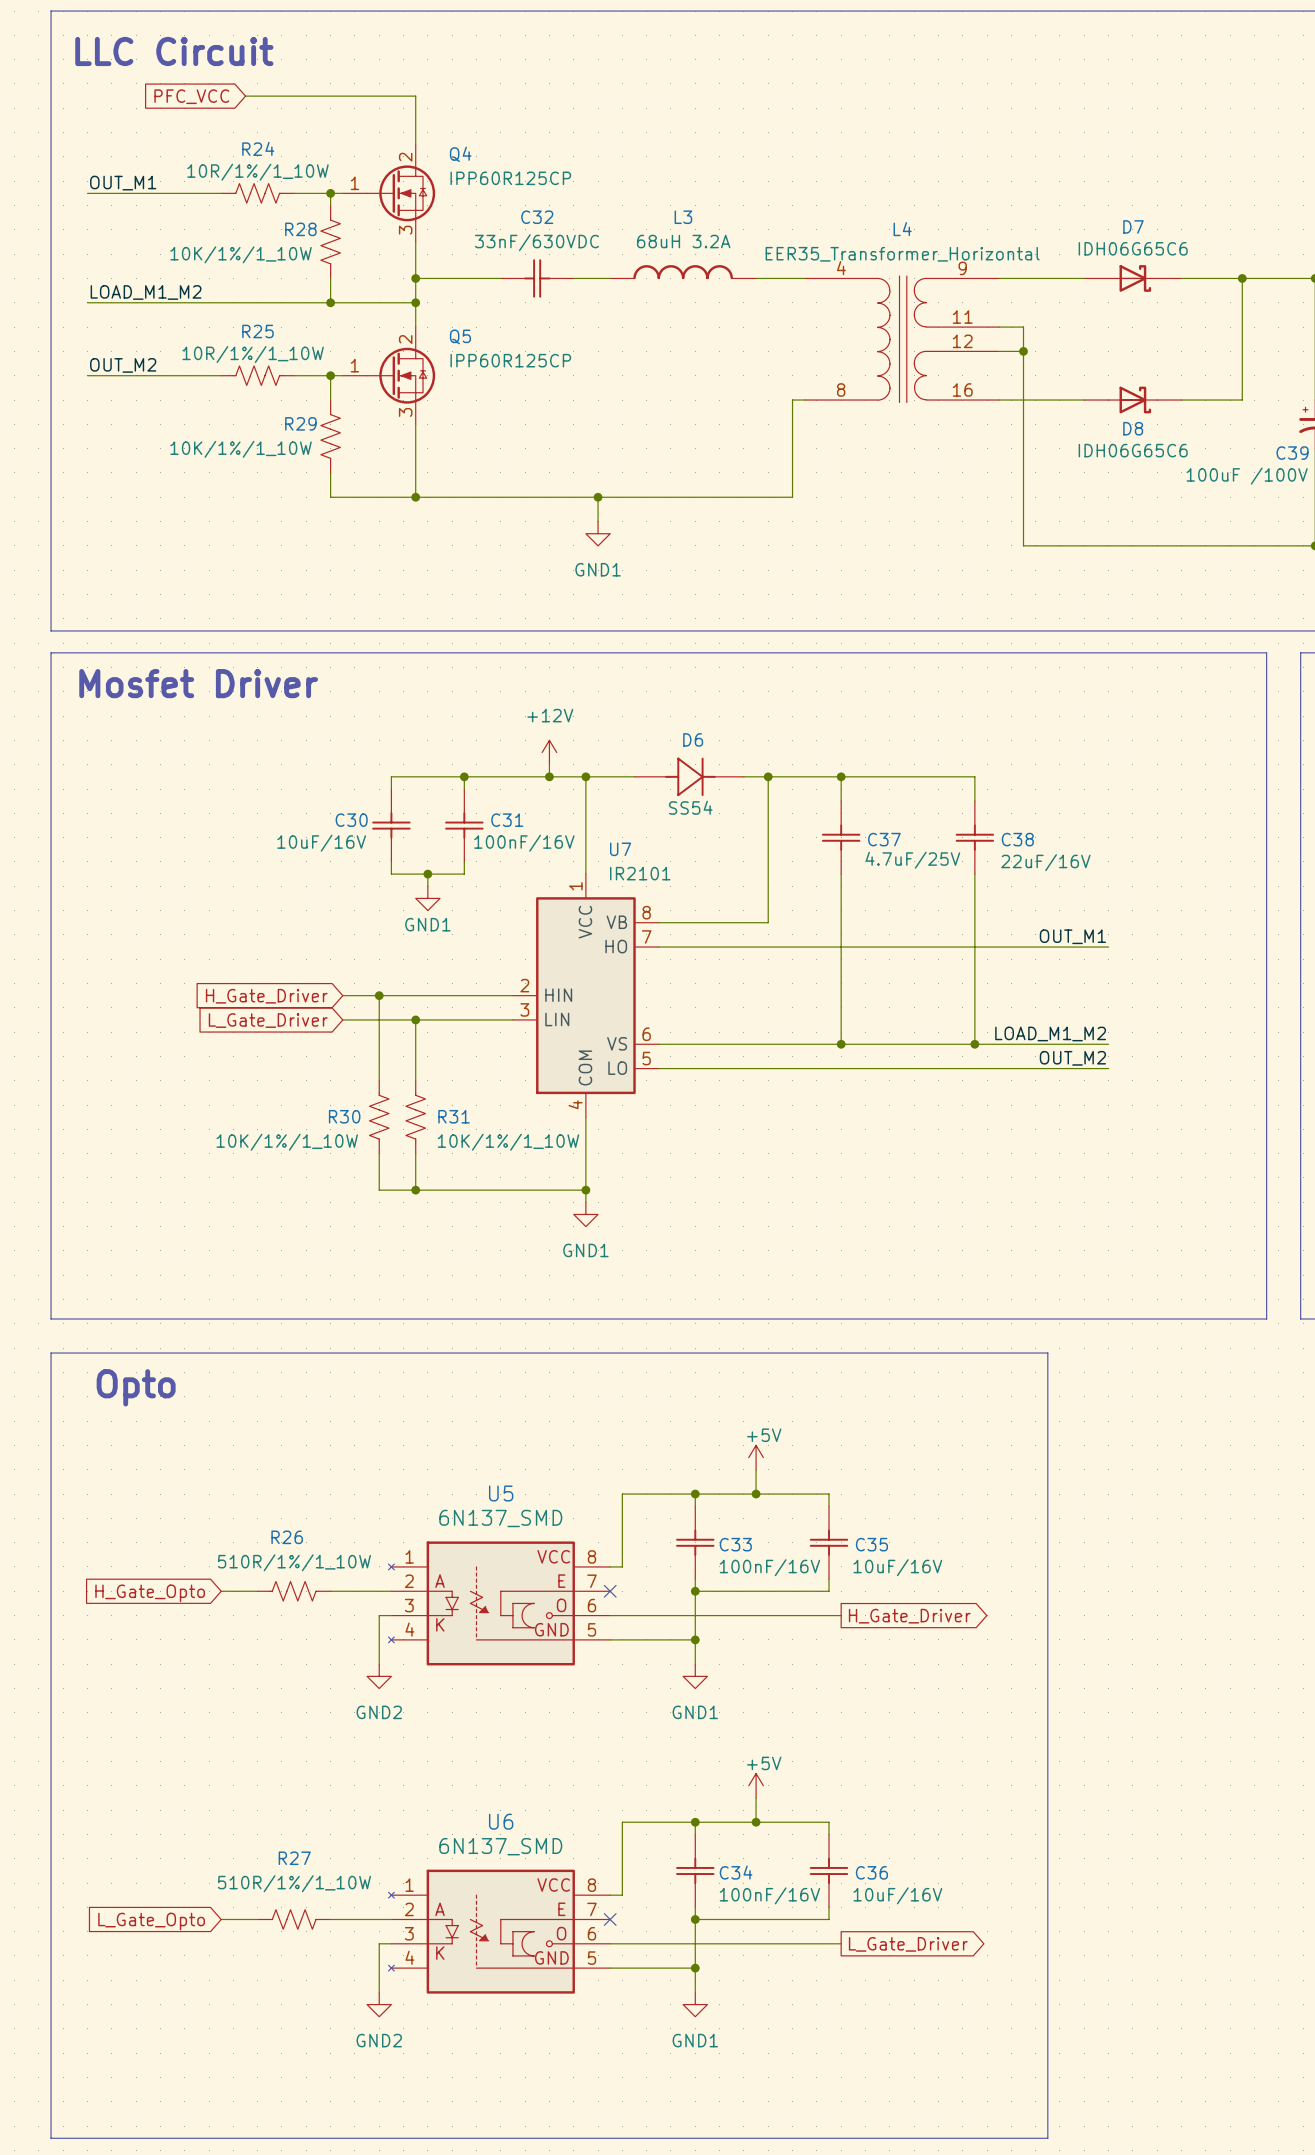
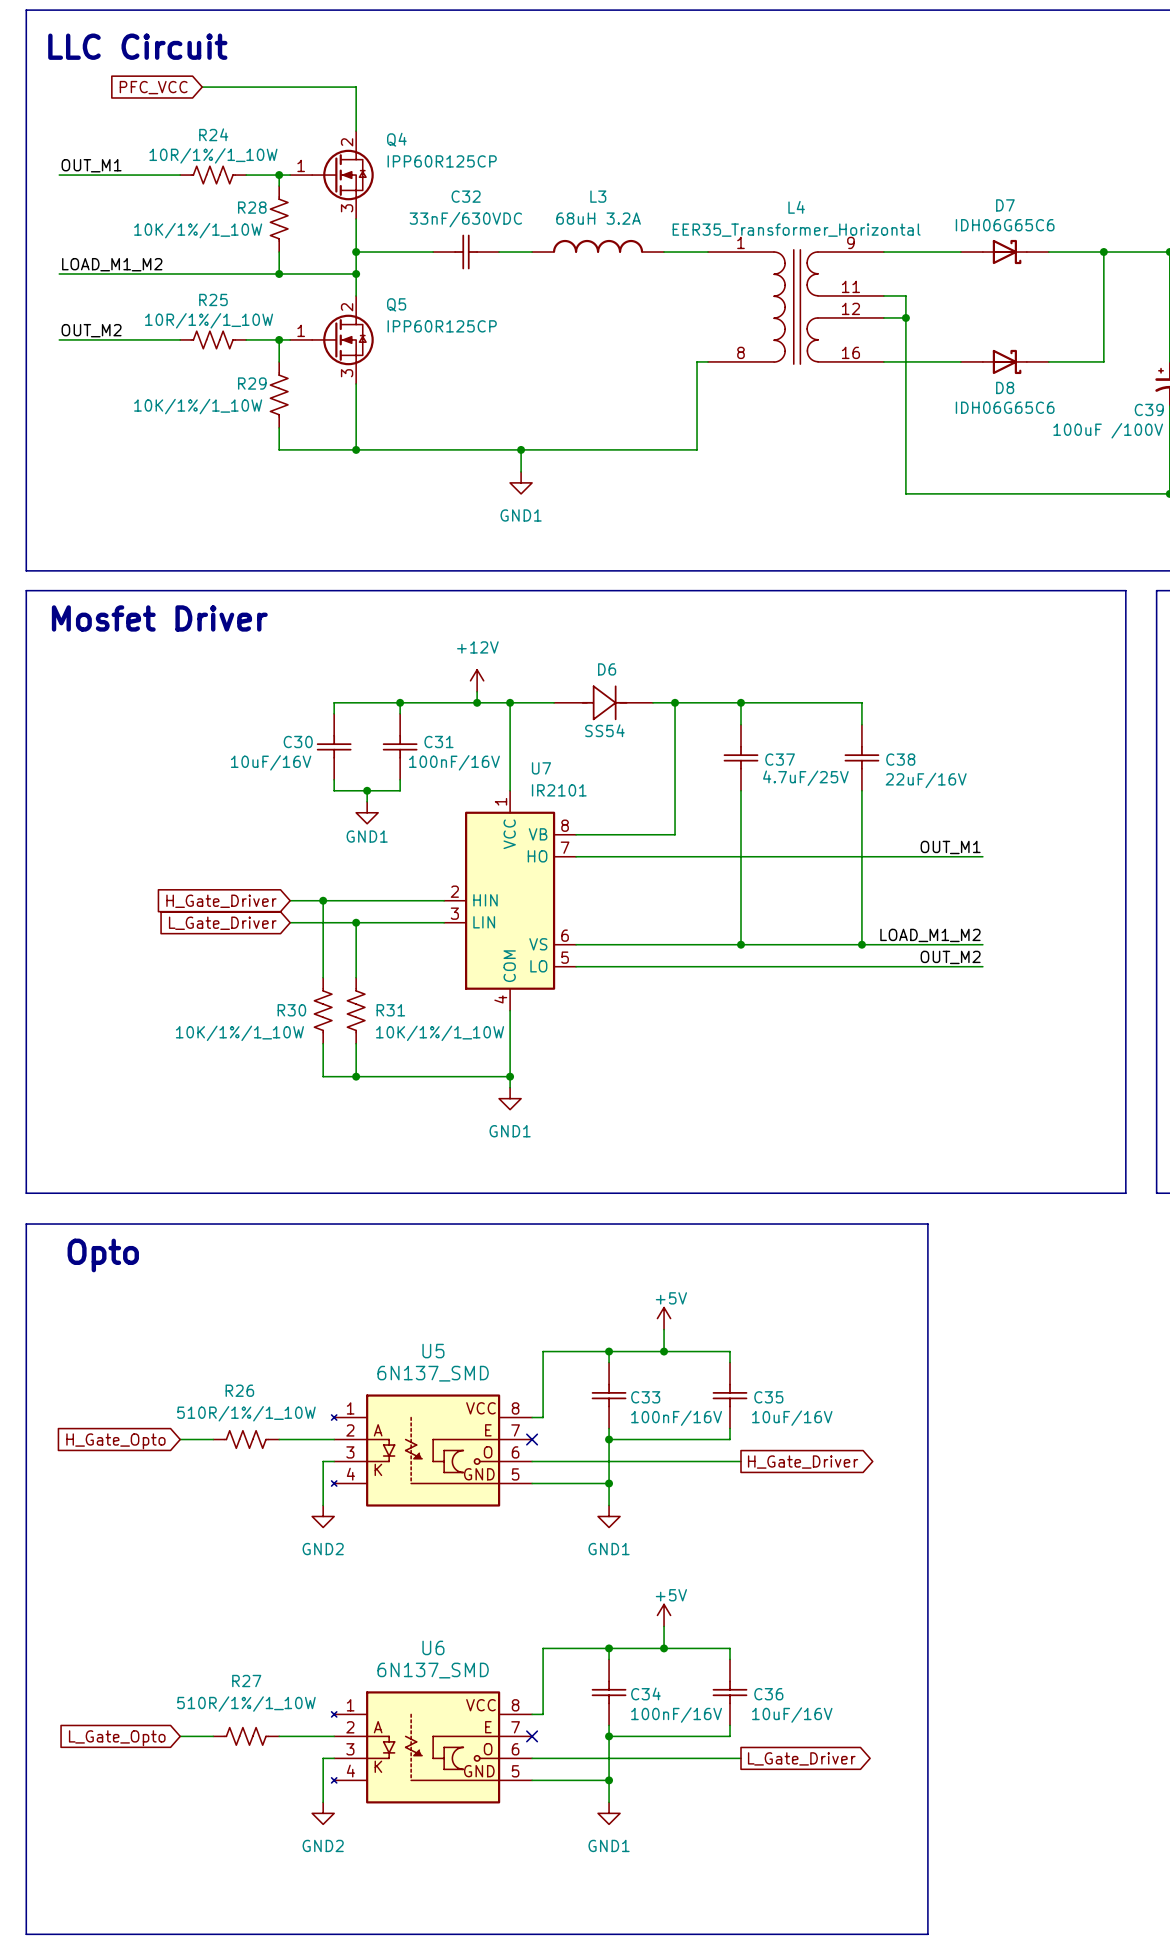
L4 pin number: 4 (841, 268) -> 1 (740, 242)

